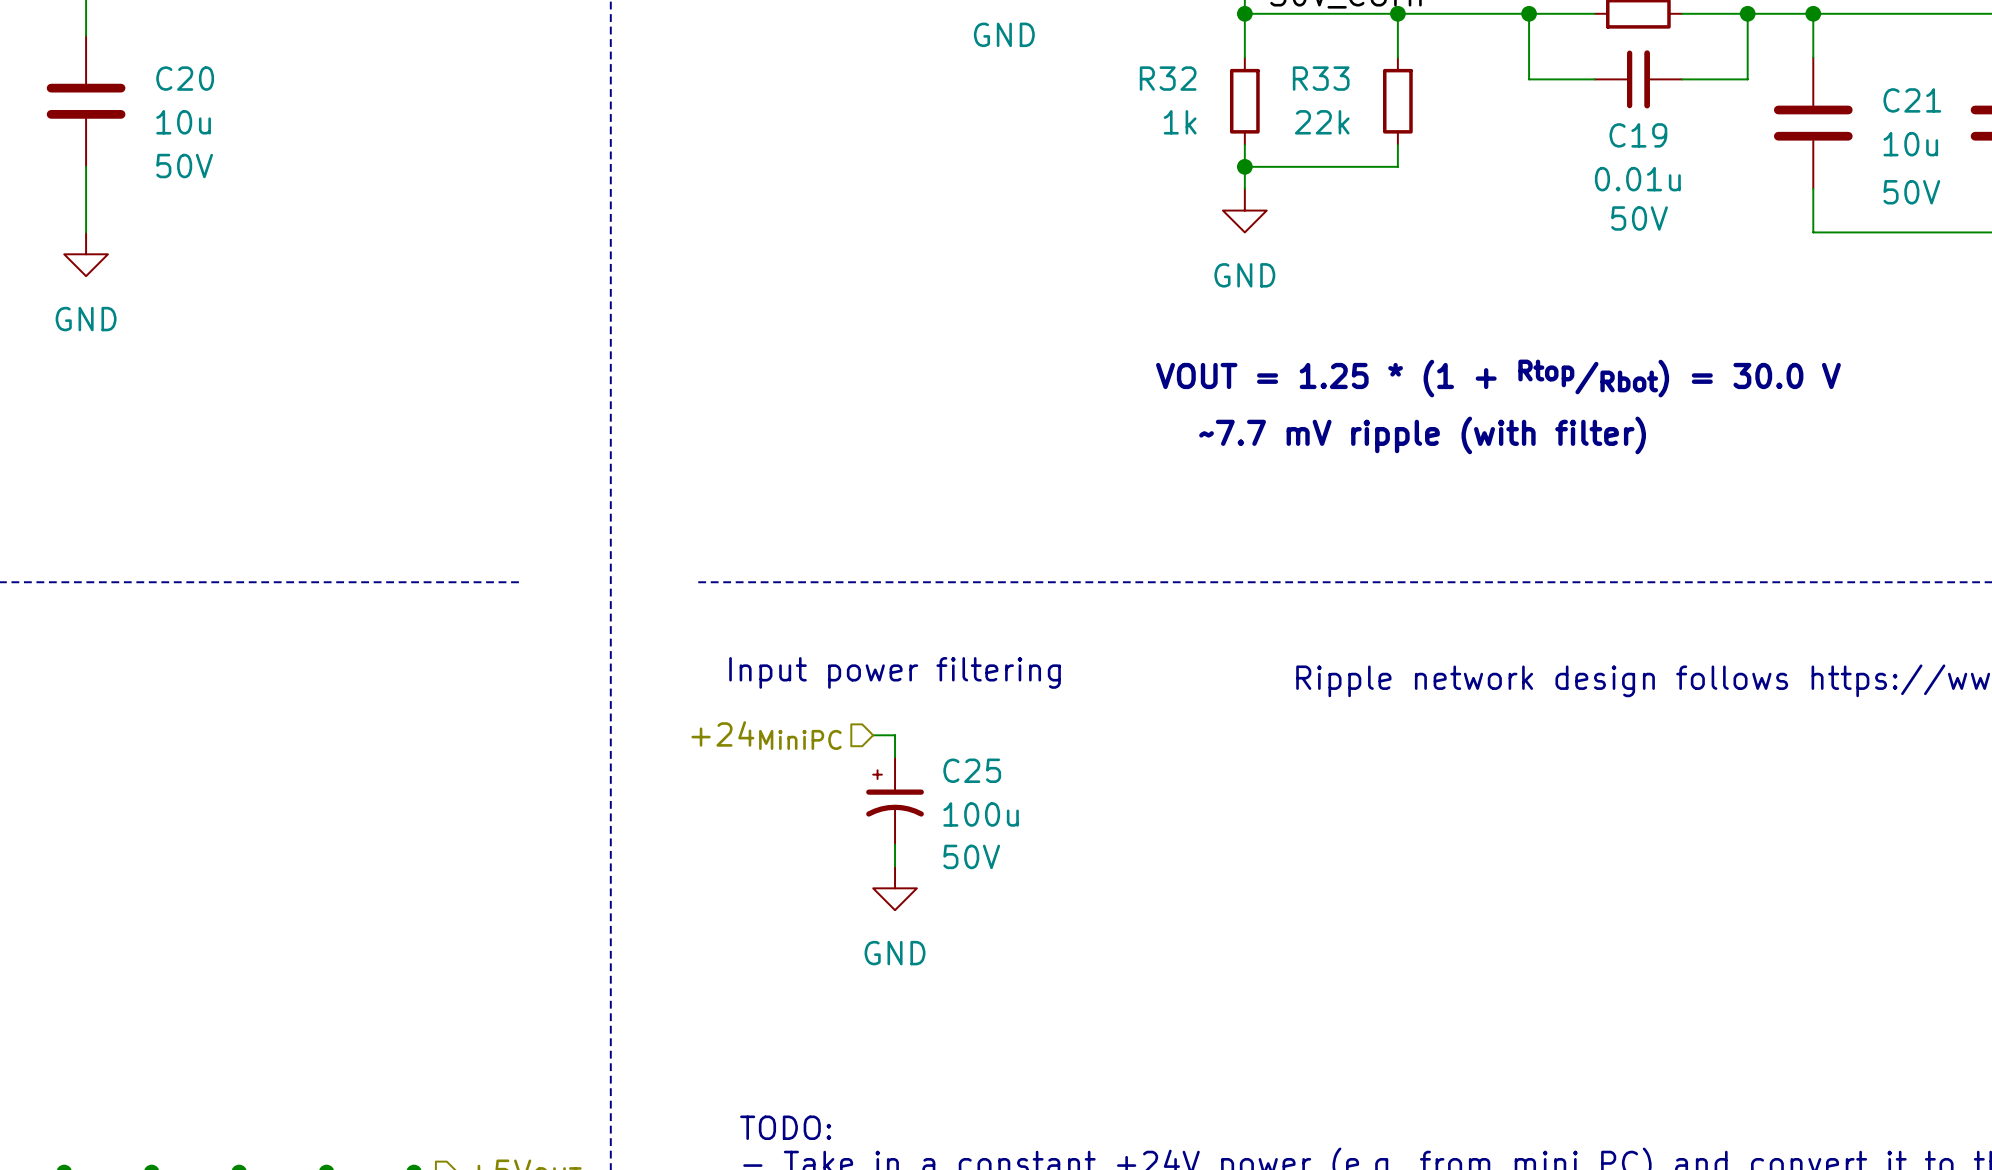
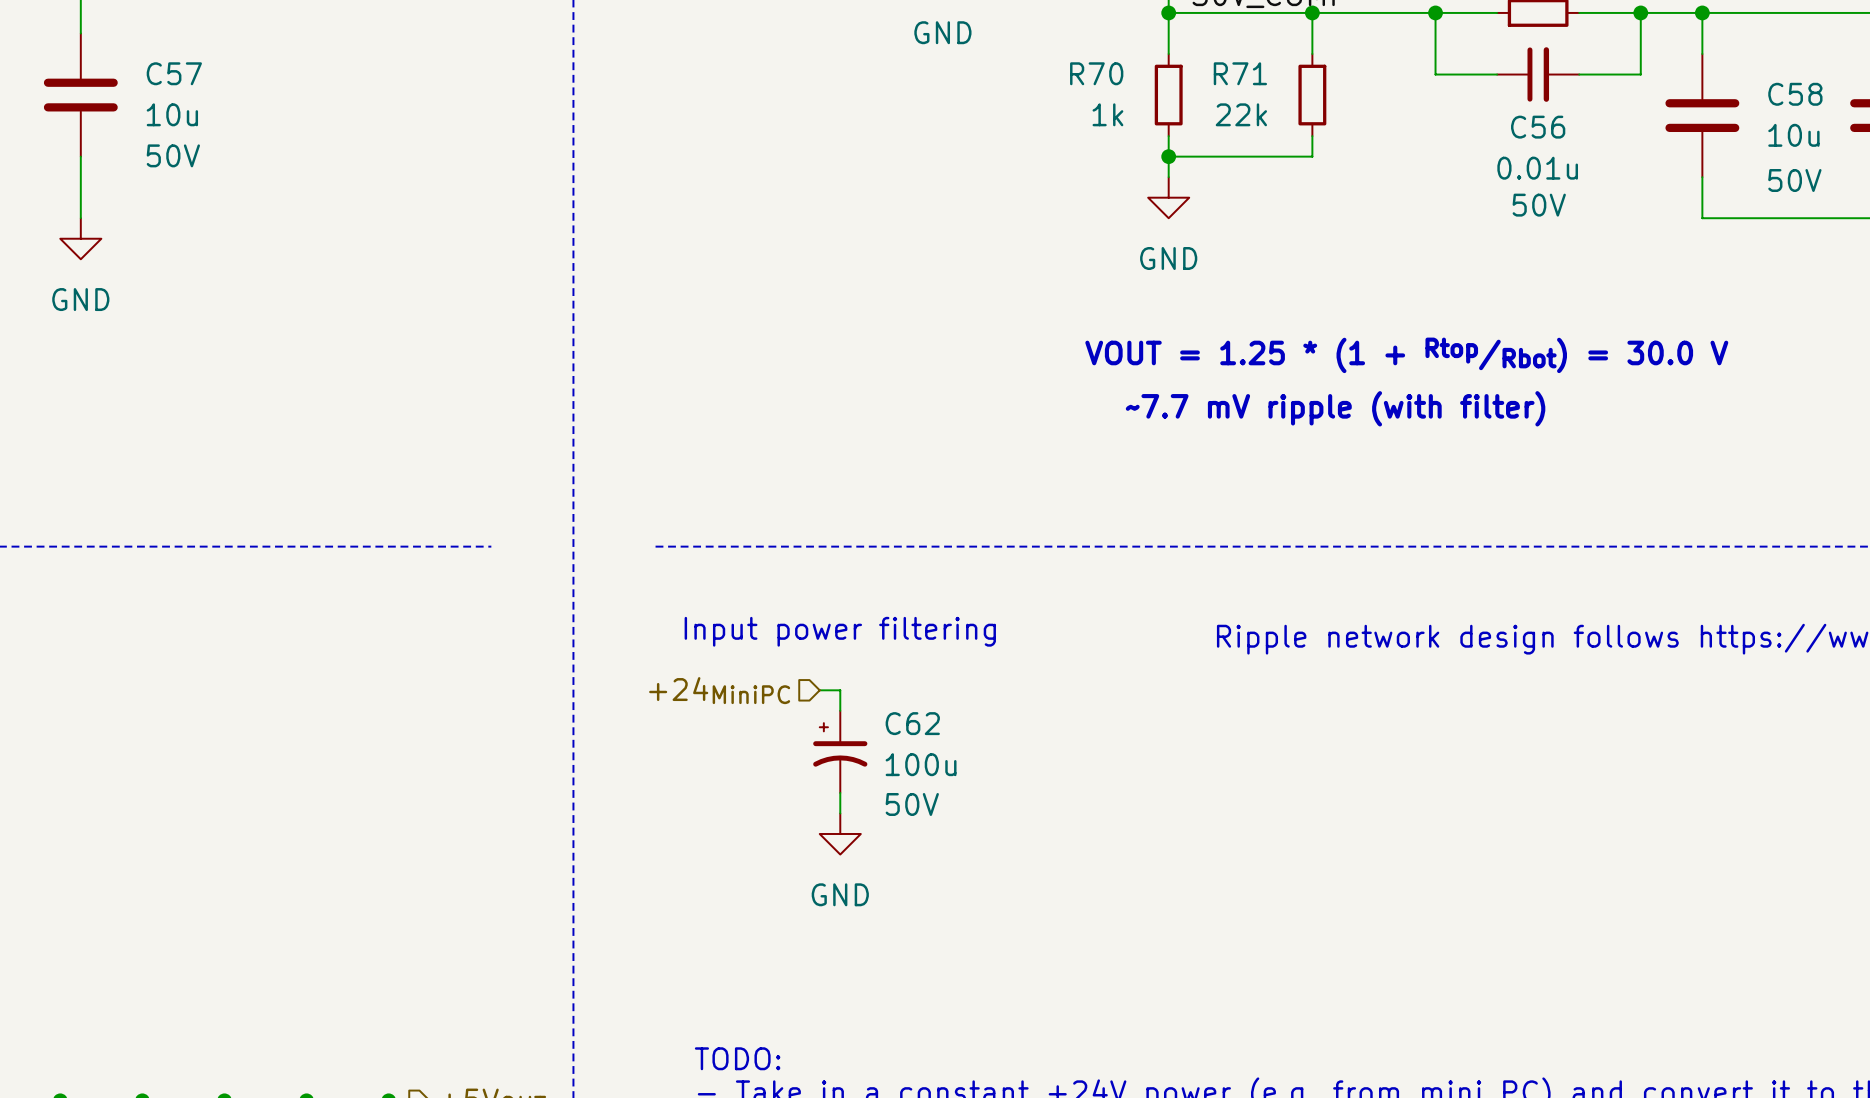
C20 name: C20 (185, 78) -> C57 (174, 73)
R32 name: R32 (1168, 78) -> R70 (1096, 73)
R33 name: R33 (1321, 78) -> R71 (1240, 73)
C21 name: C21 (1912, 100) -> C58 (1795, 94)
C19 name: C19 (1638, 135) -> C56 (1538, 127)
C25 name: C25 (972, 770) -> C62 (912, 723)

